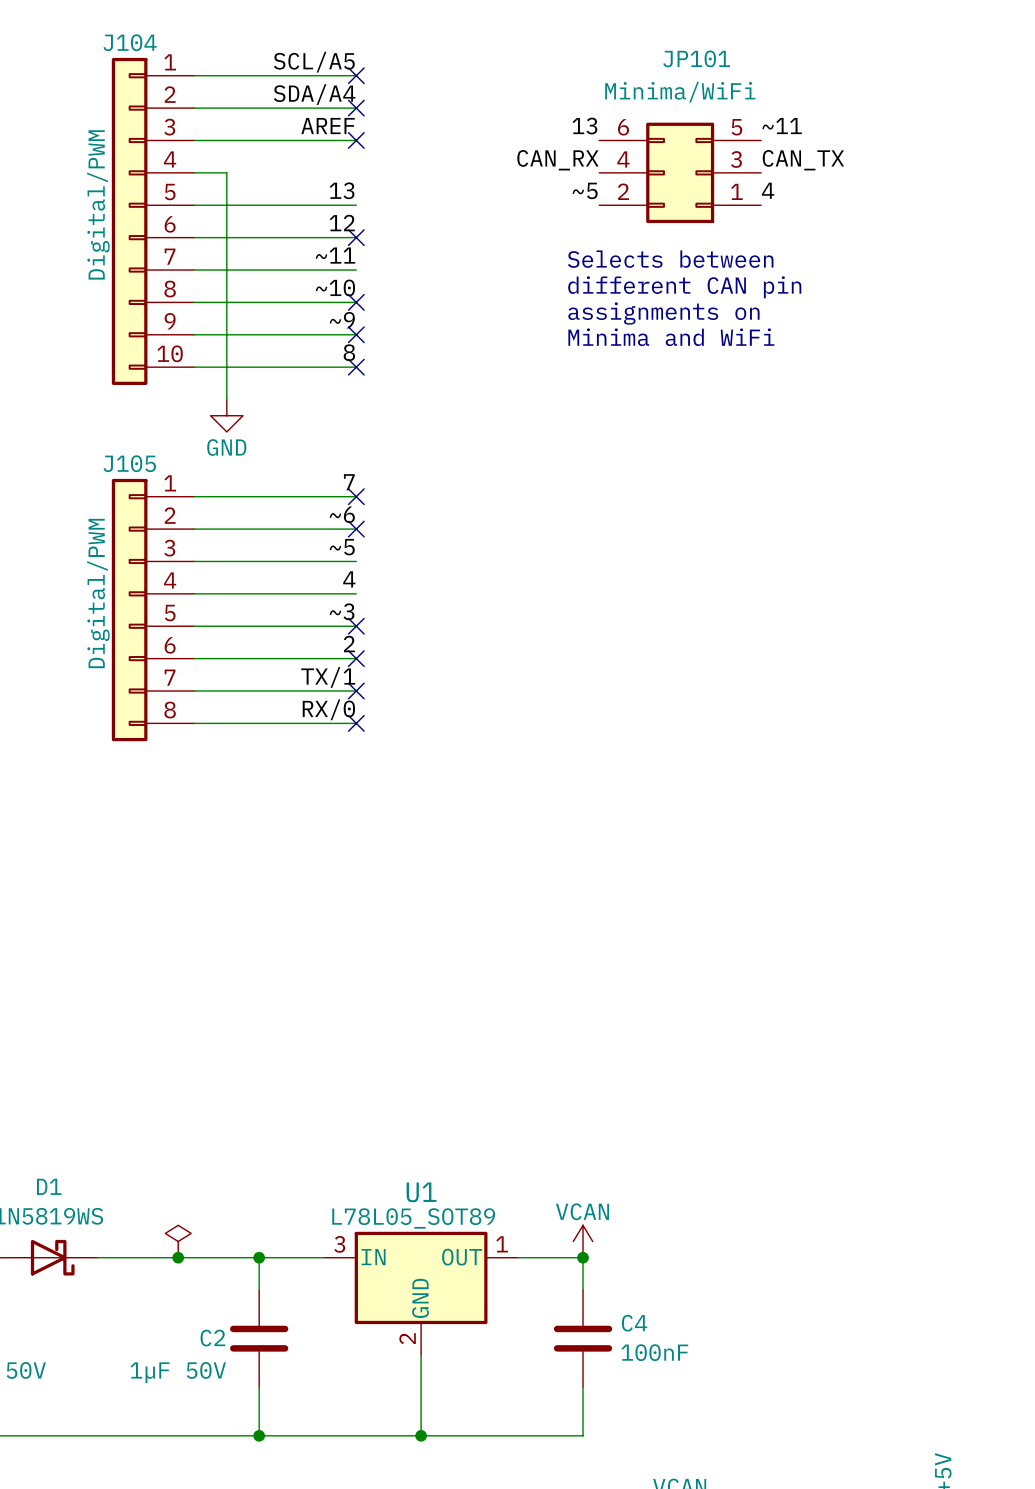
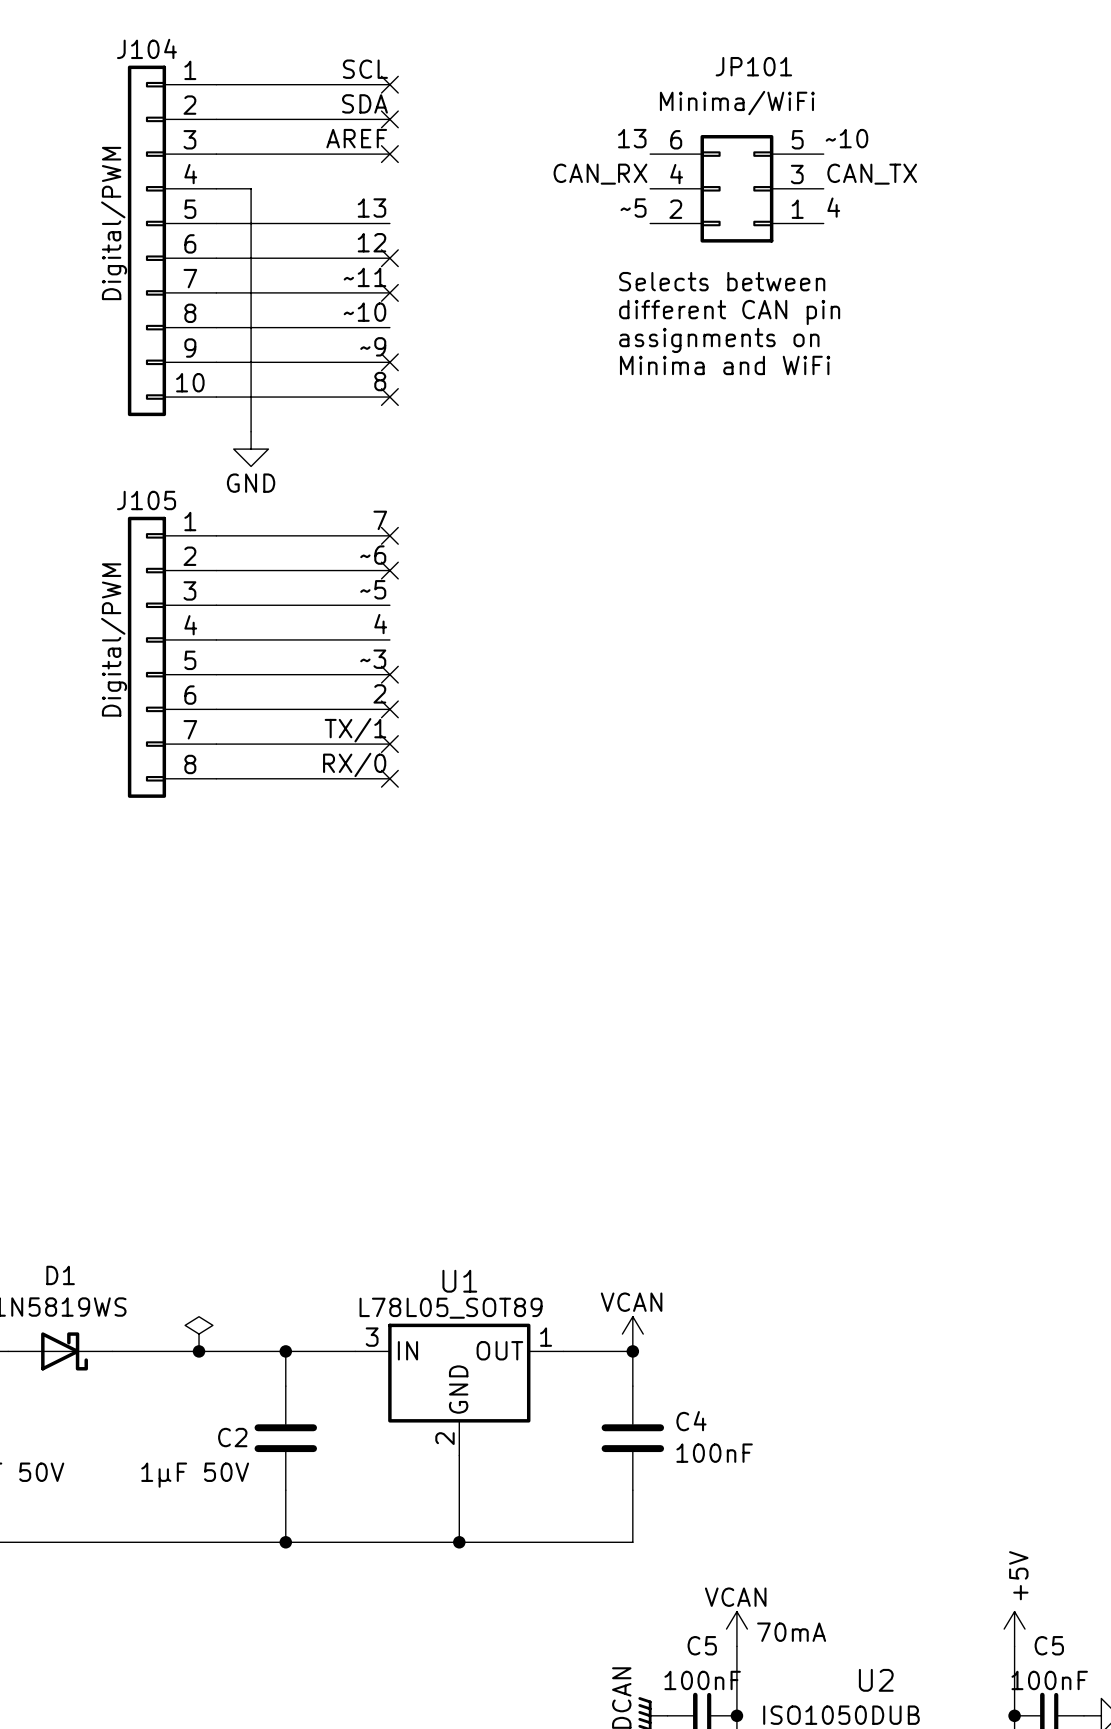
label: SCL/A5 (314, 62) -> SCL (365, 69)
label: SDA/A4 (314, 94) -> SDA (364, 103)
label: ~11 (782, 126) -> ~10 (846, 138)
no-connect mark position: (356, 302) -> (389, 292)

